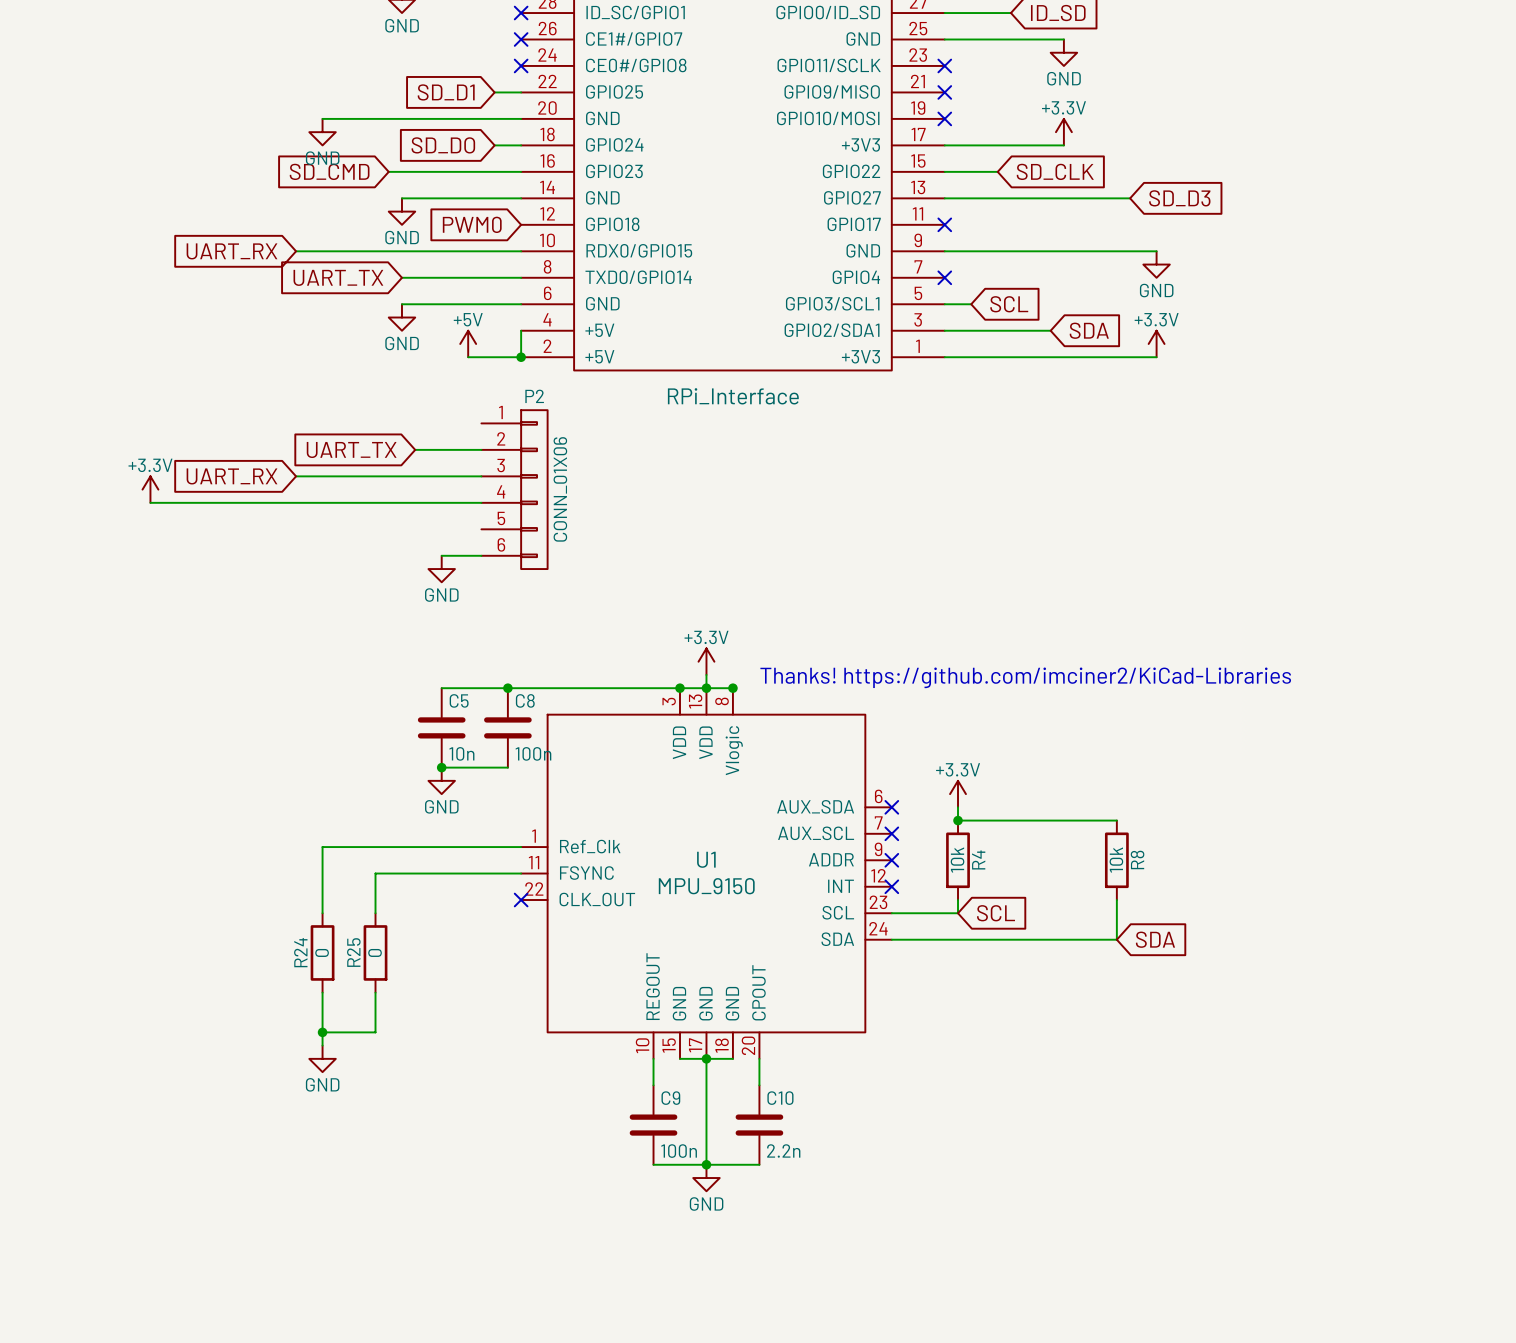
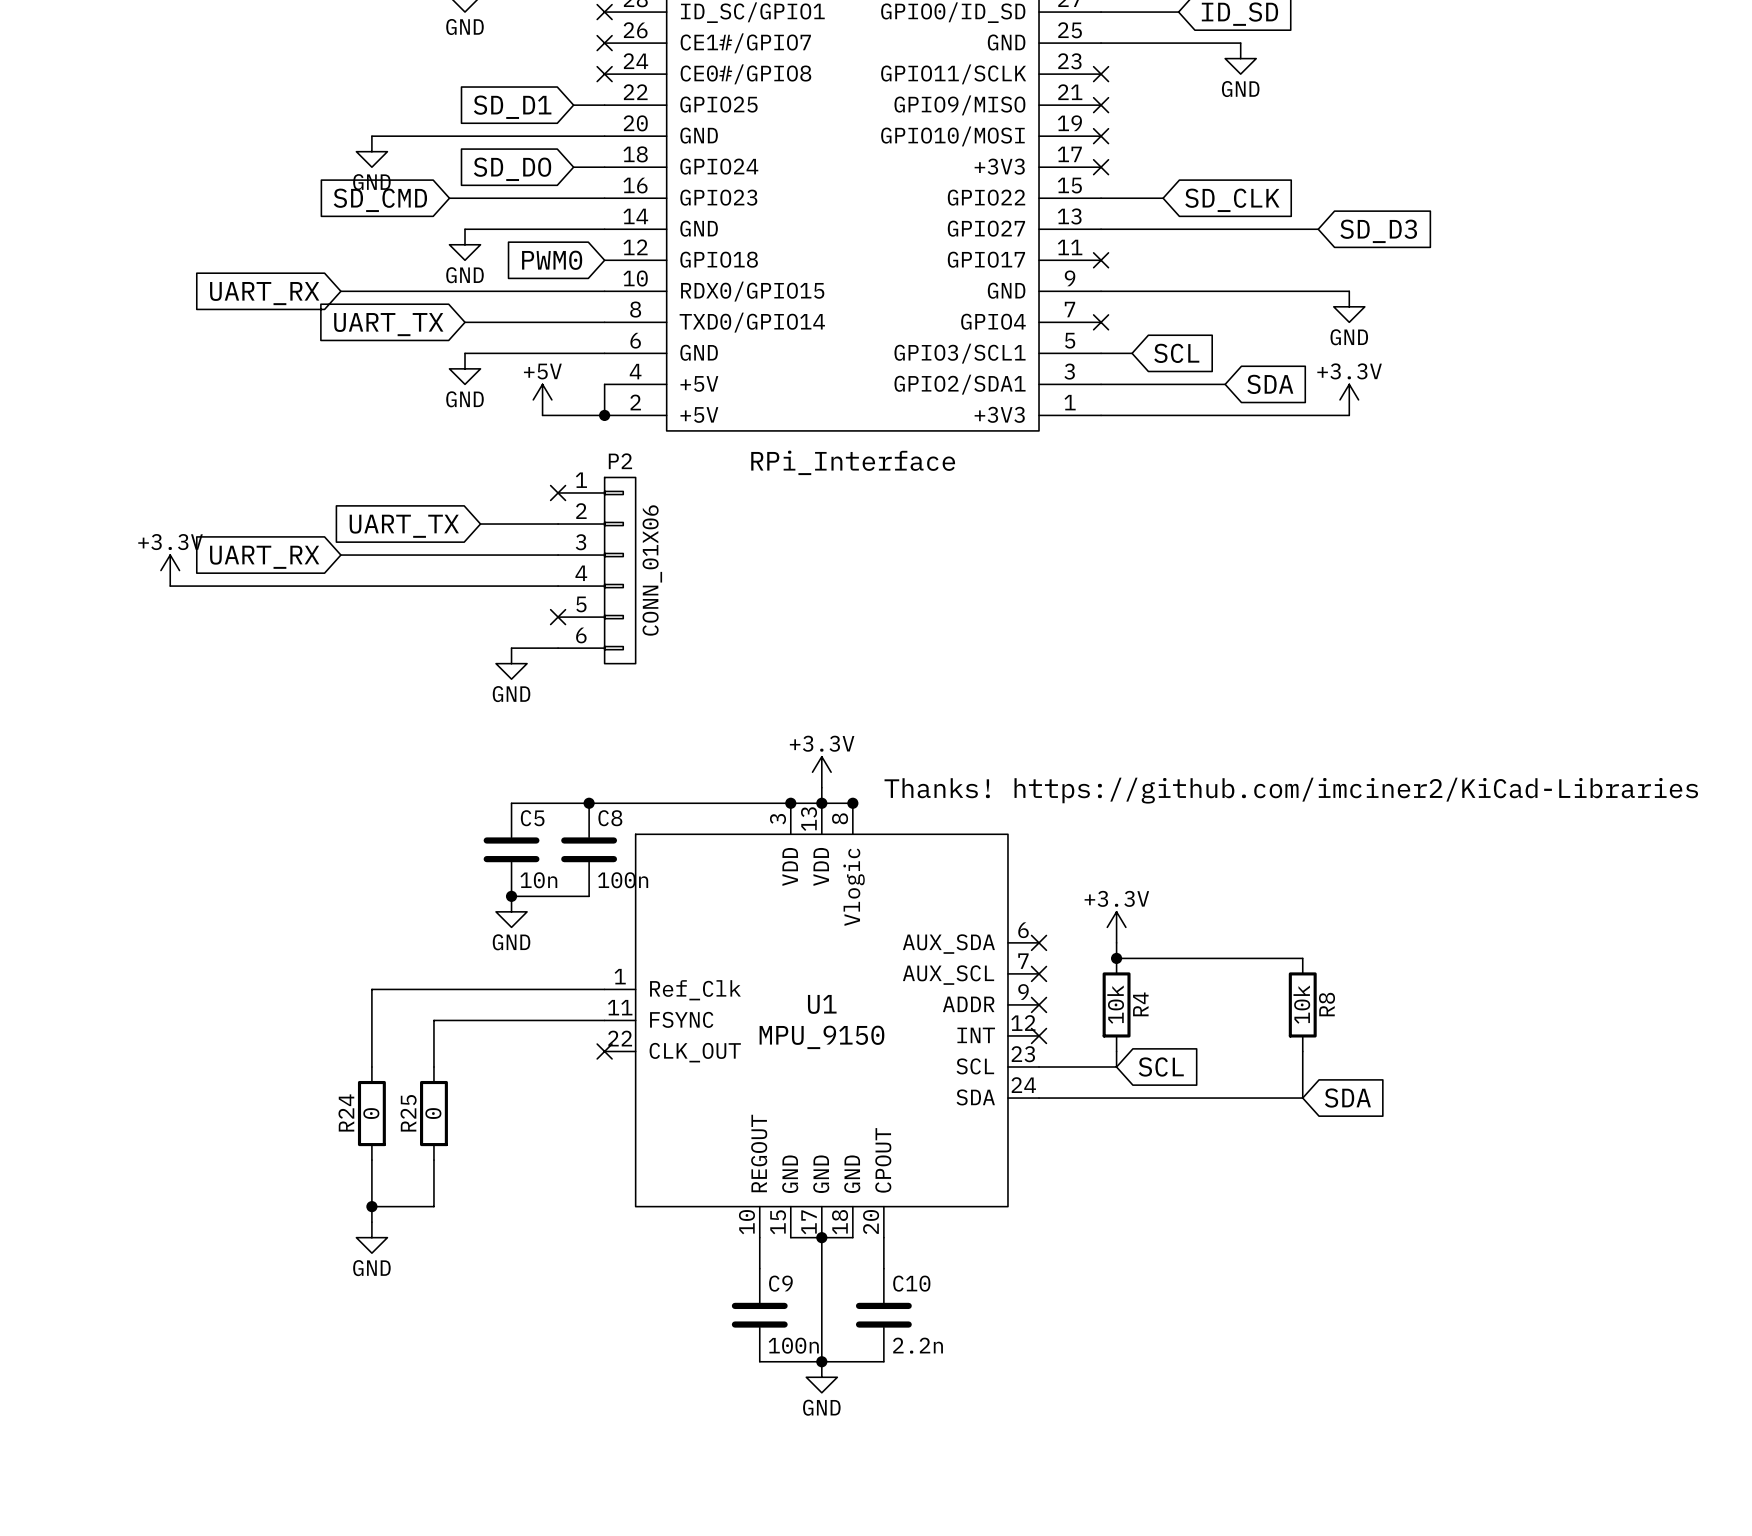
power symbol: +3.3V (1063, 132) -> none
wire: (944, 145) (1063, 145) -> none
no-connect mark: none -> (1101, 167)
no-connect mark: none -> (558, 492)
no-connect mark: none -> (558, 617)

